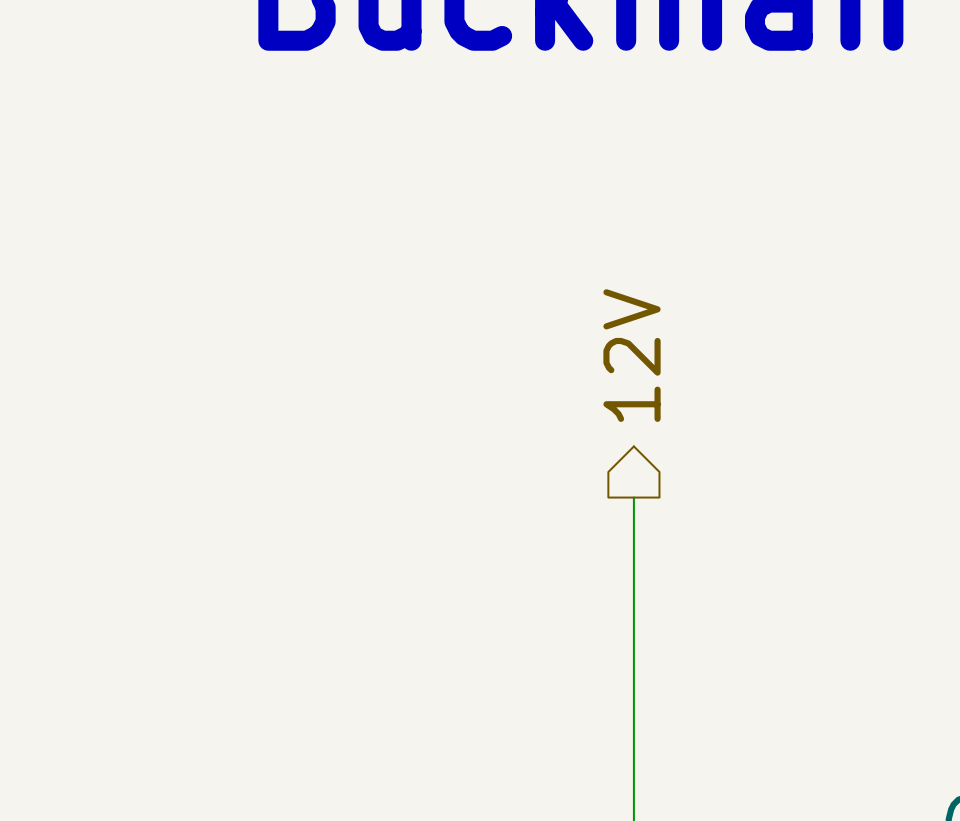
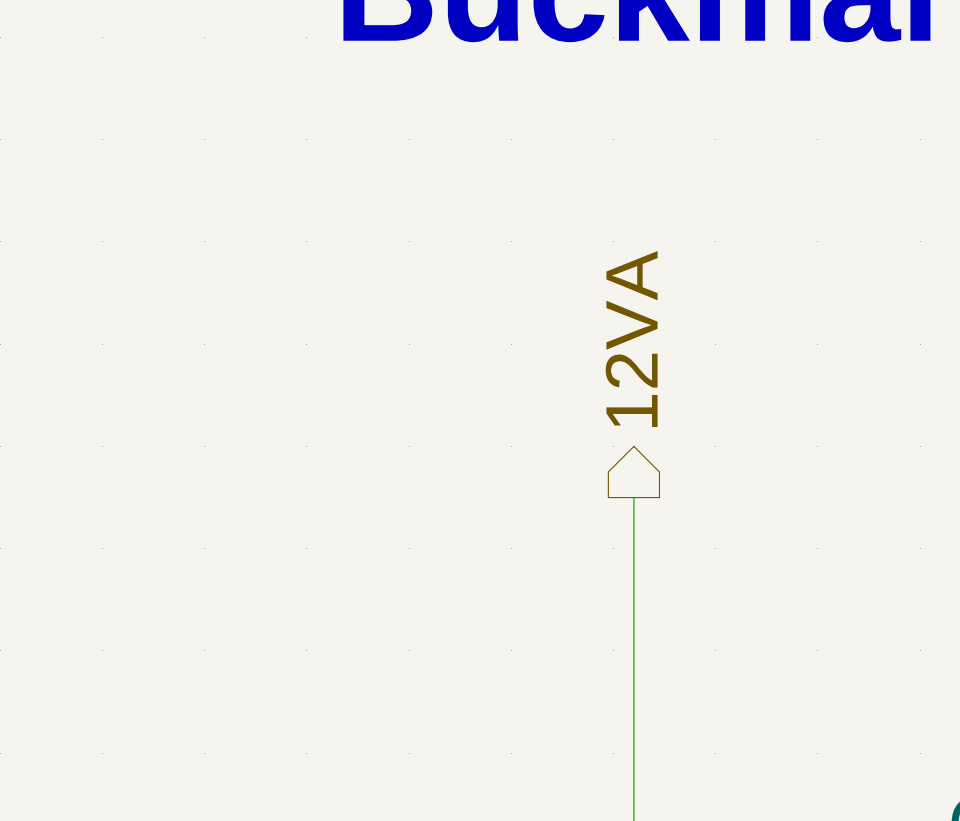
hierarchical label: 12V (632, 355) -> 12VA (631, 339)

